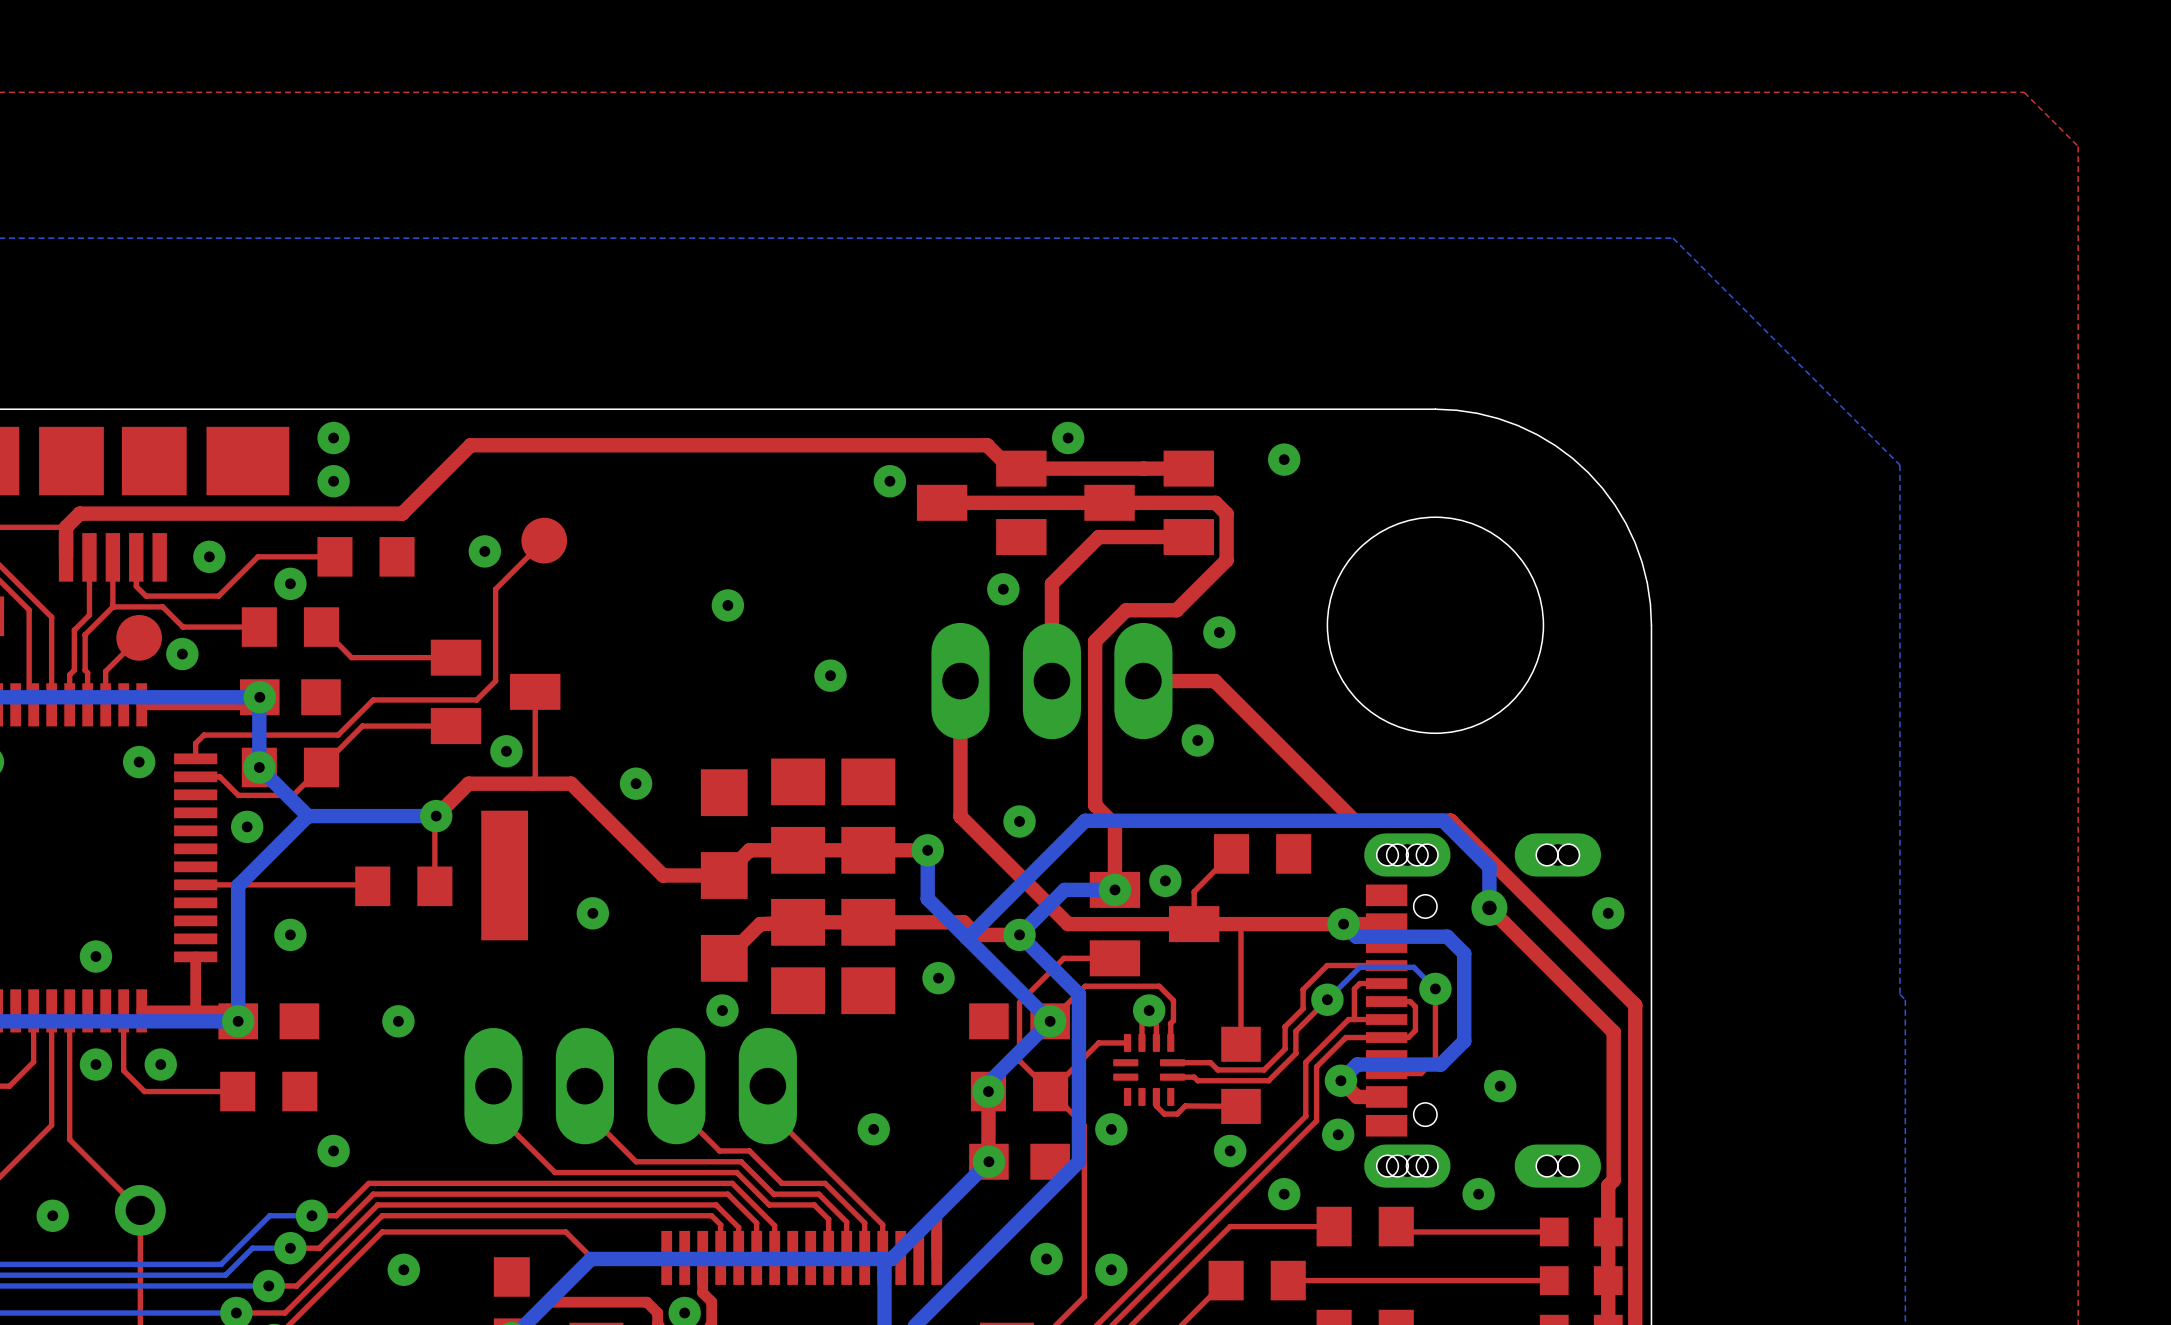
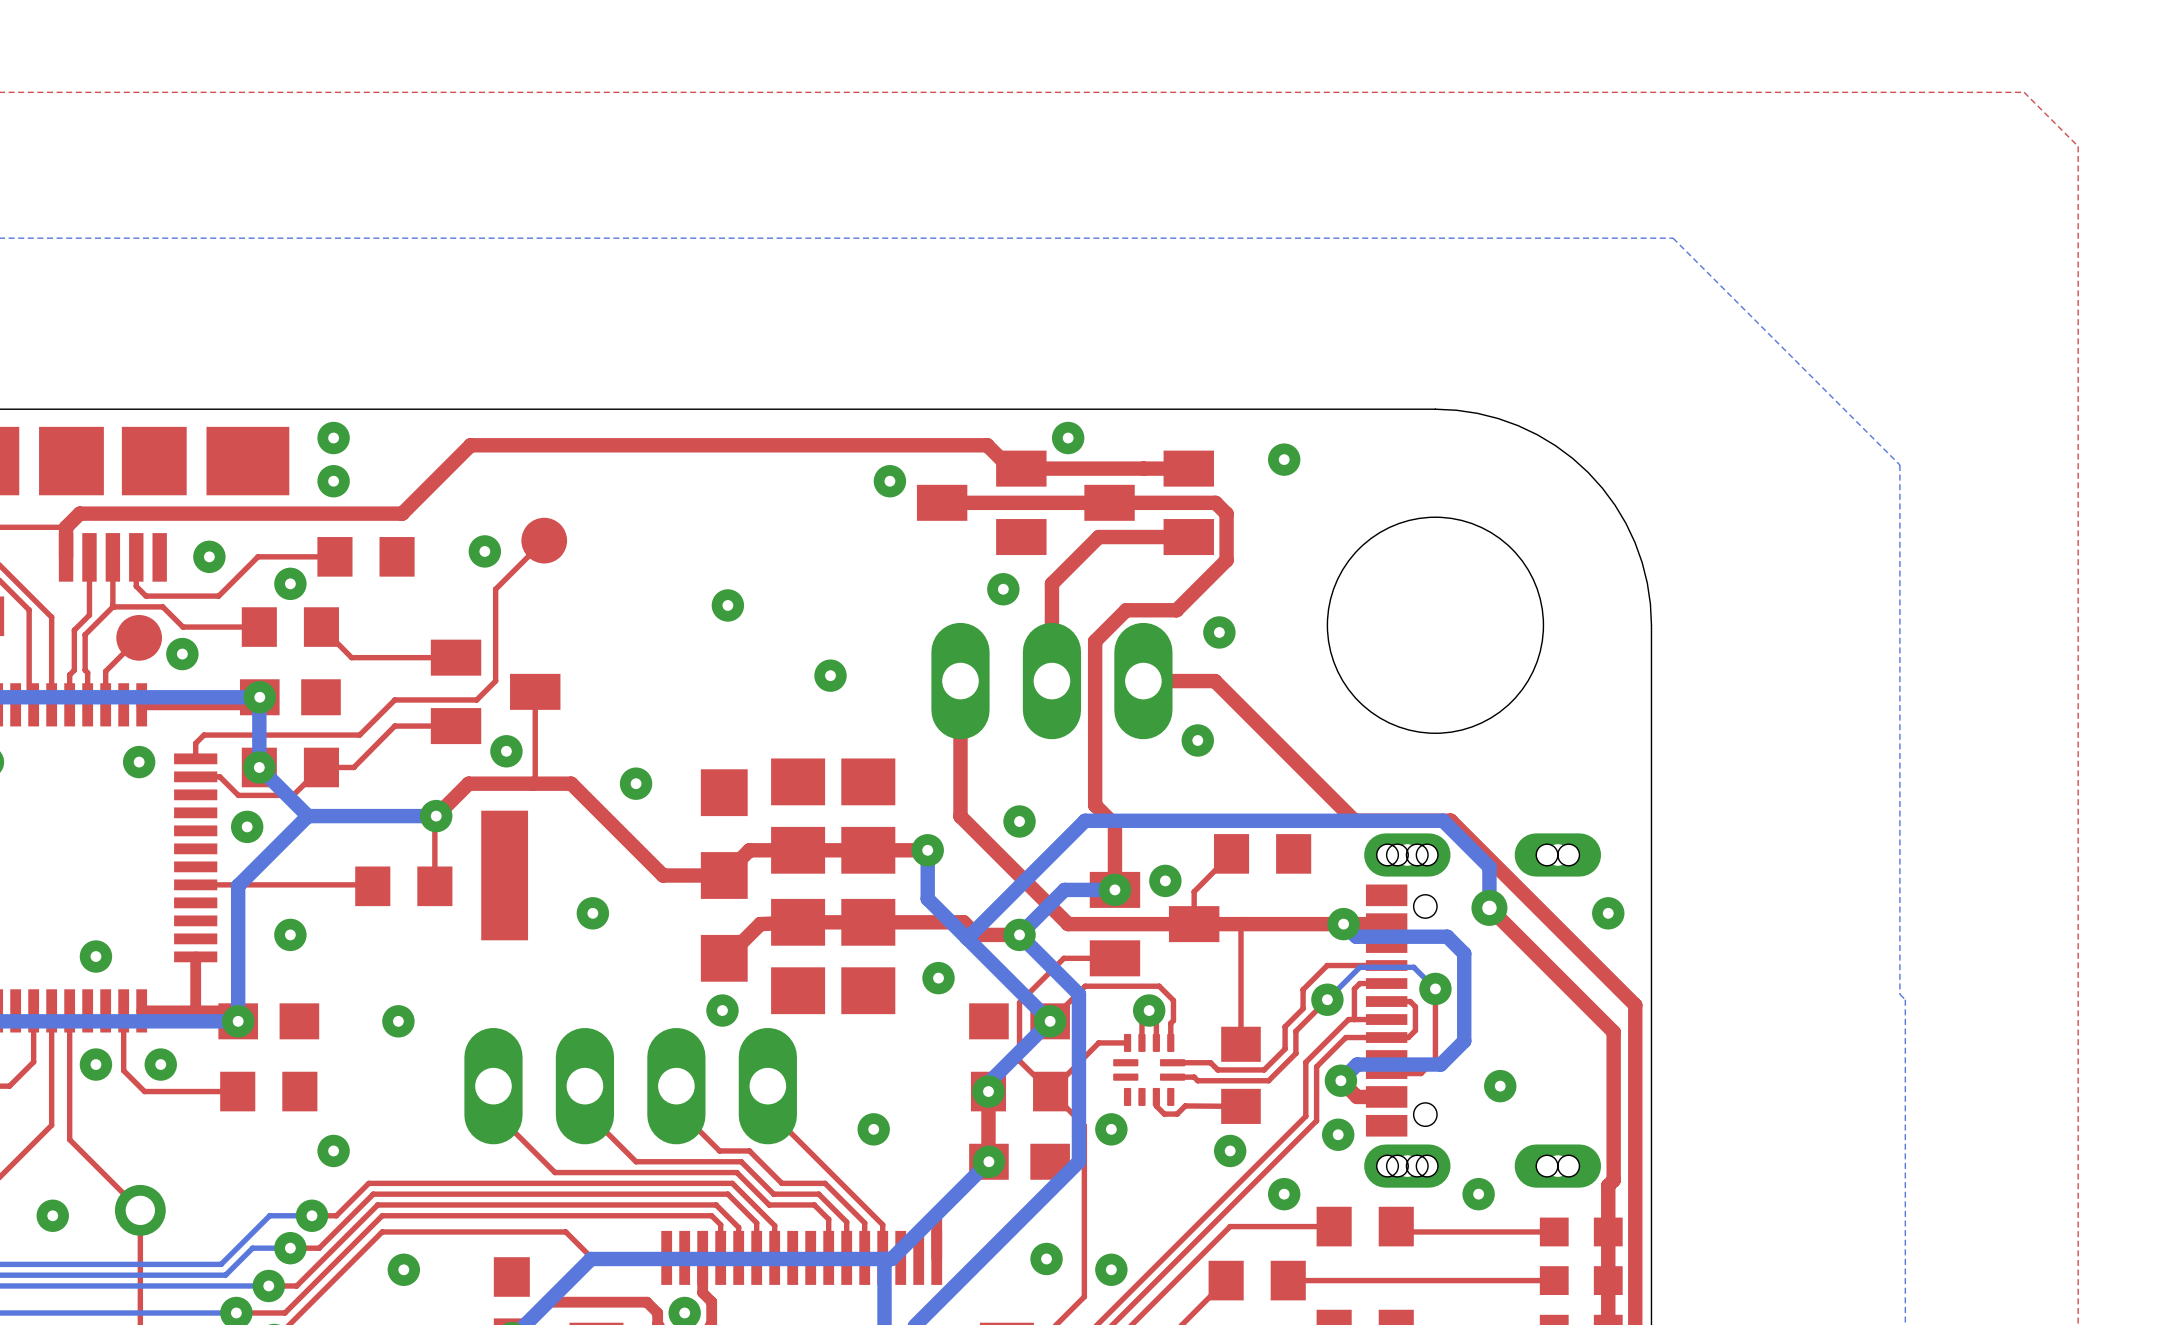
top track: (394, 699) (373, 699) (338, 735) -> (394, 699) (359, 735) (338, 735)
top track: (394, 726) (362, 726) (321, 767) -> (394, 726) (353, 767) (321, 767)

